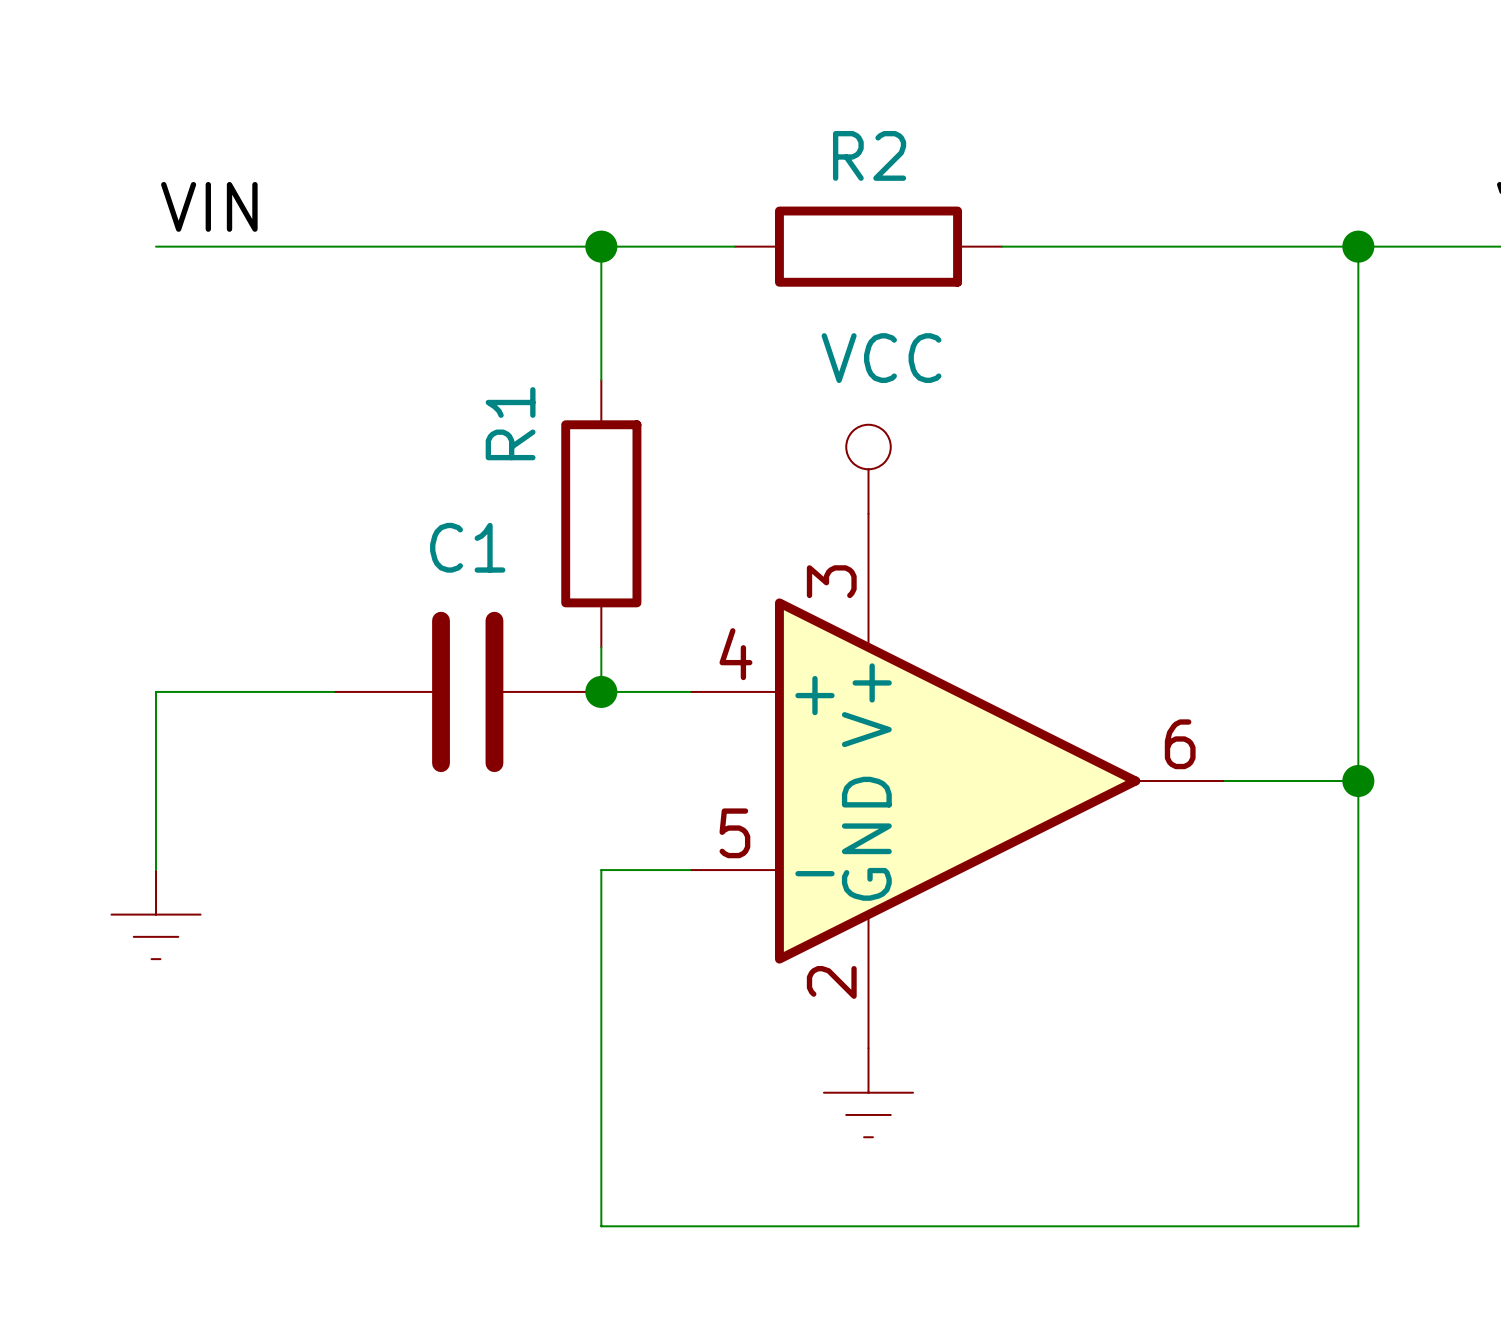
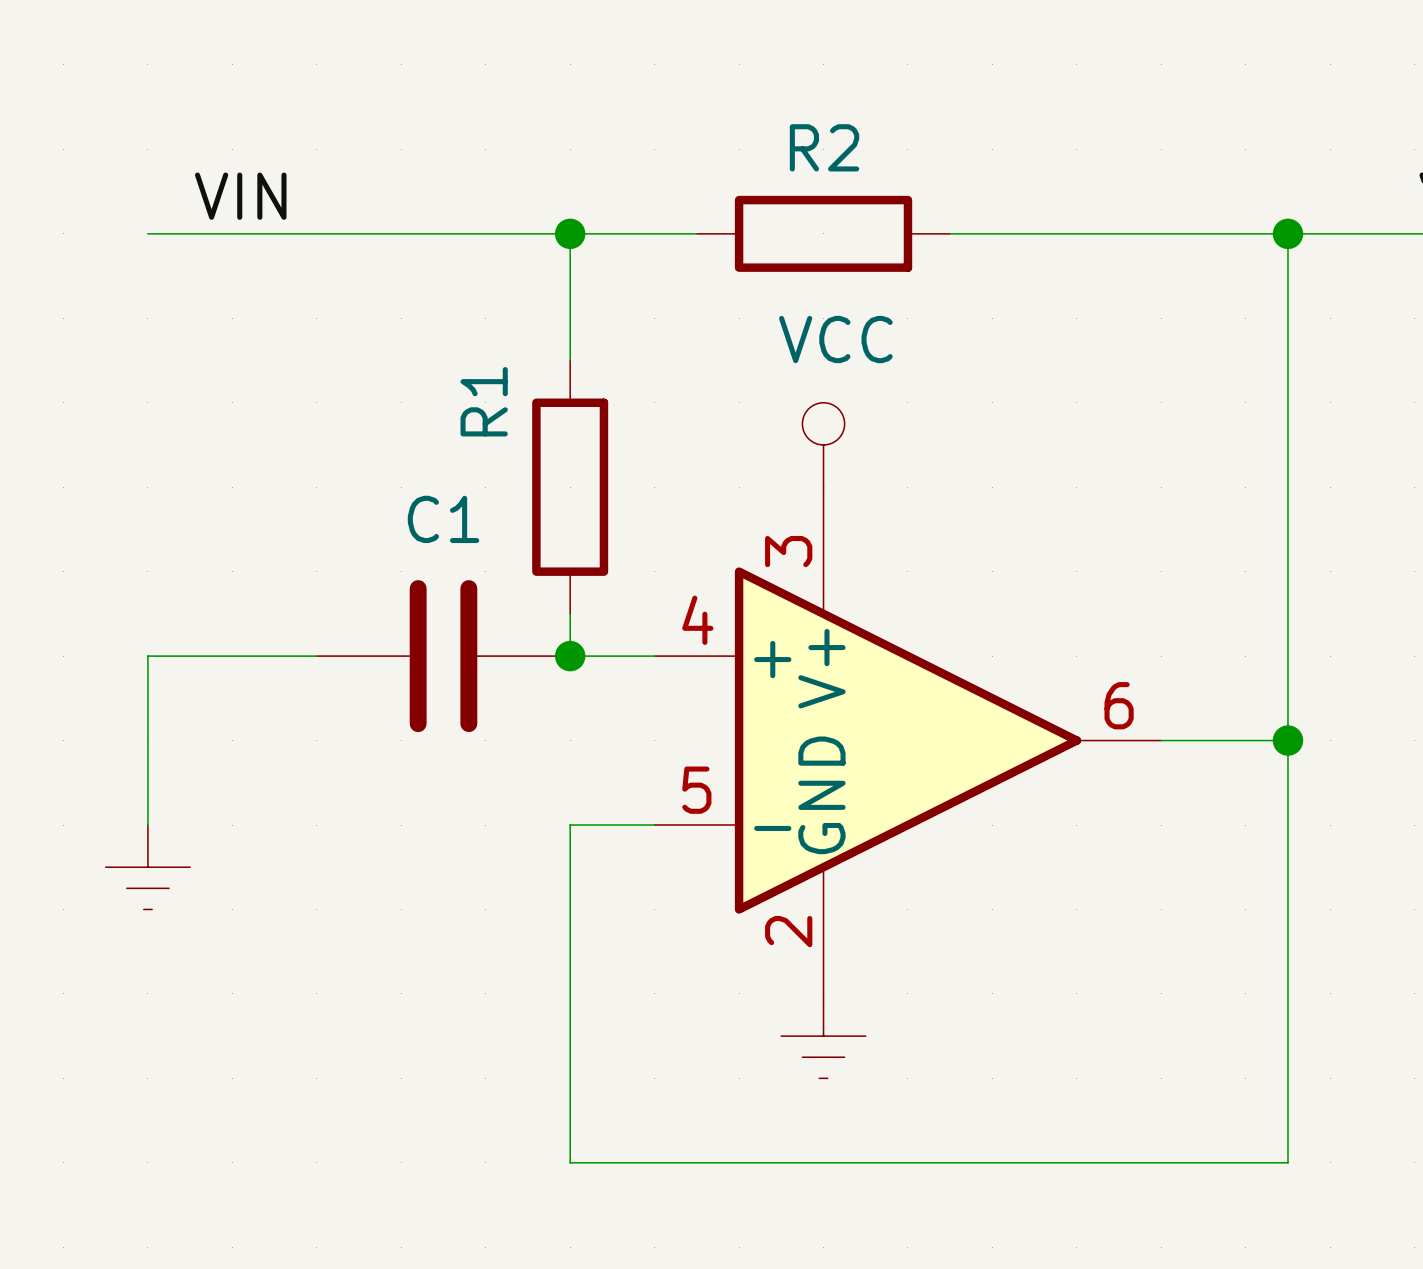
label position: VIN (209, 206) -> VIN (240, 196)

